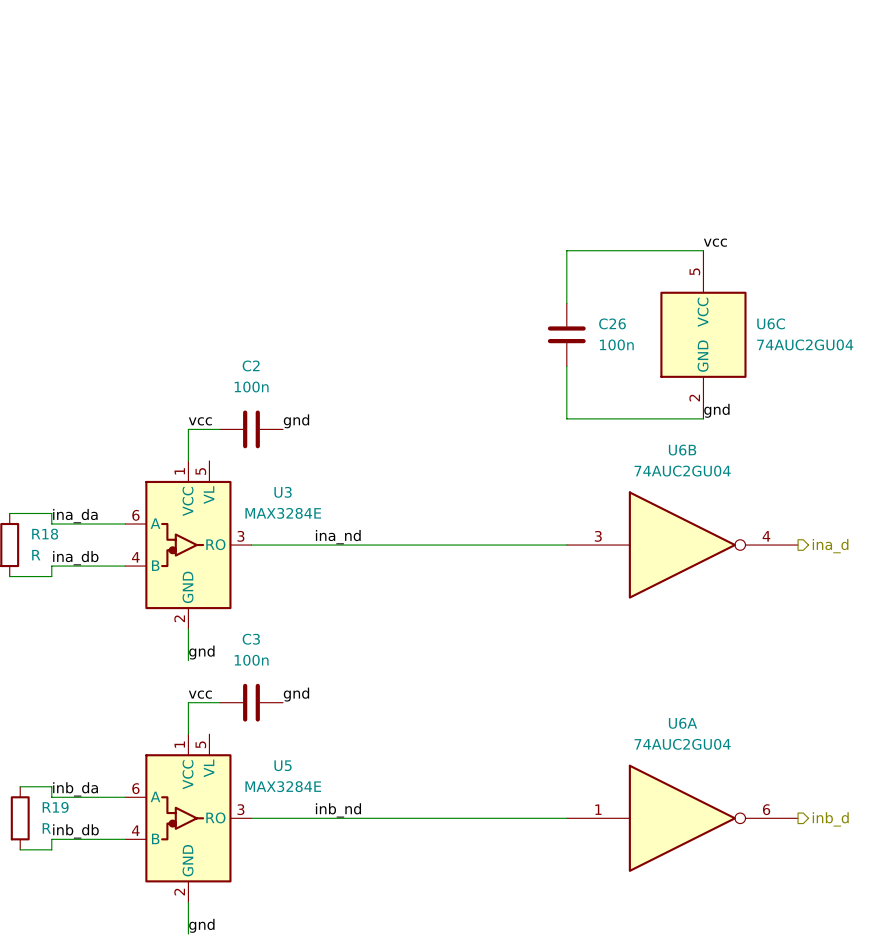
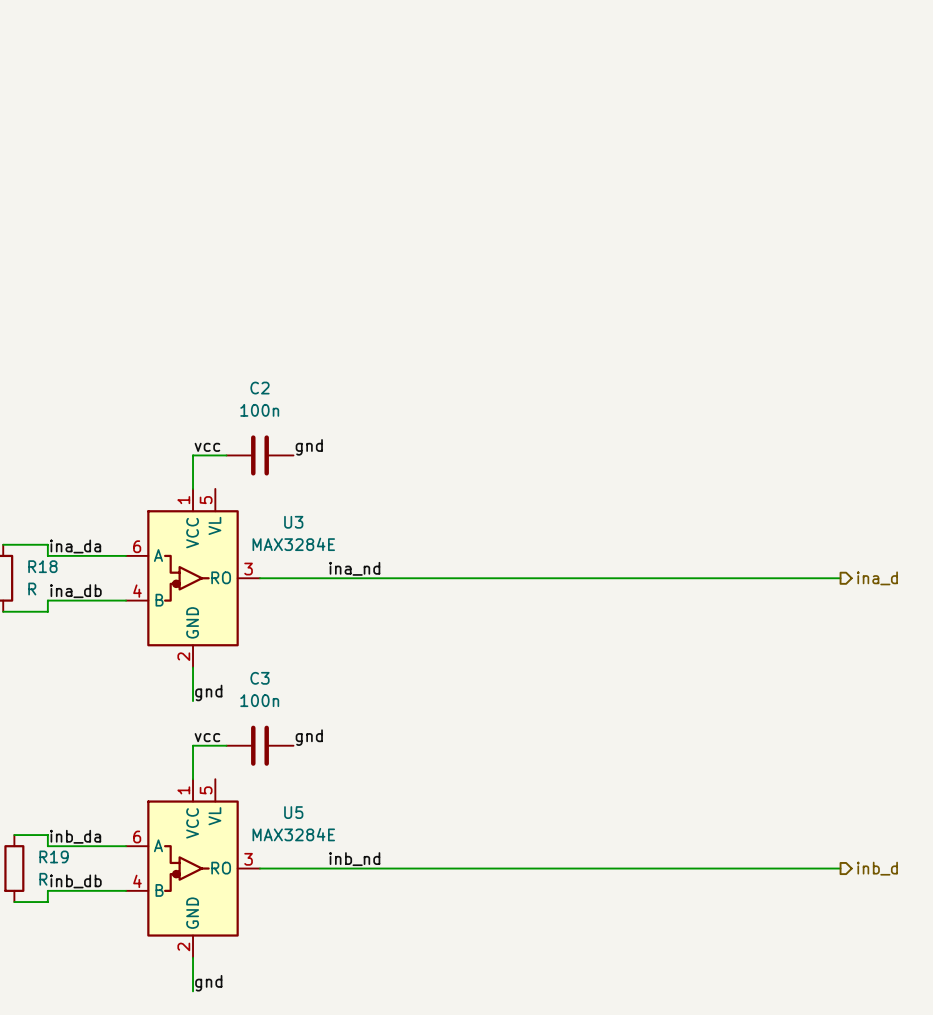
label: vcc (715, 242) -> none
wire: (703, 250) (566, 250) (566, 303) -> none
C26: 100n (566, 334) -> none
U6C: 74AUC2GU04 (703, 334) -> none
wire: (566, 366) (566, 418) (703, 418) -> none
label: gnd (716, 410) -> none
U6B: 74AUC2GU04 (682, 545) -> none
U6A: 74AUC2GU04 (682, 818) -> none

